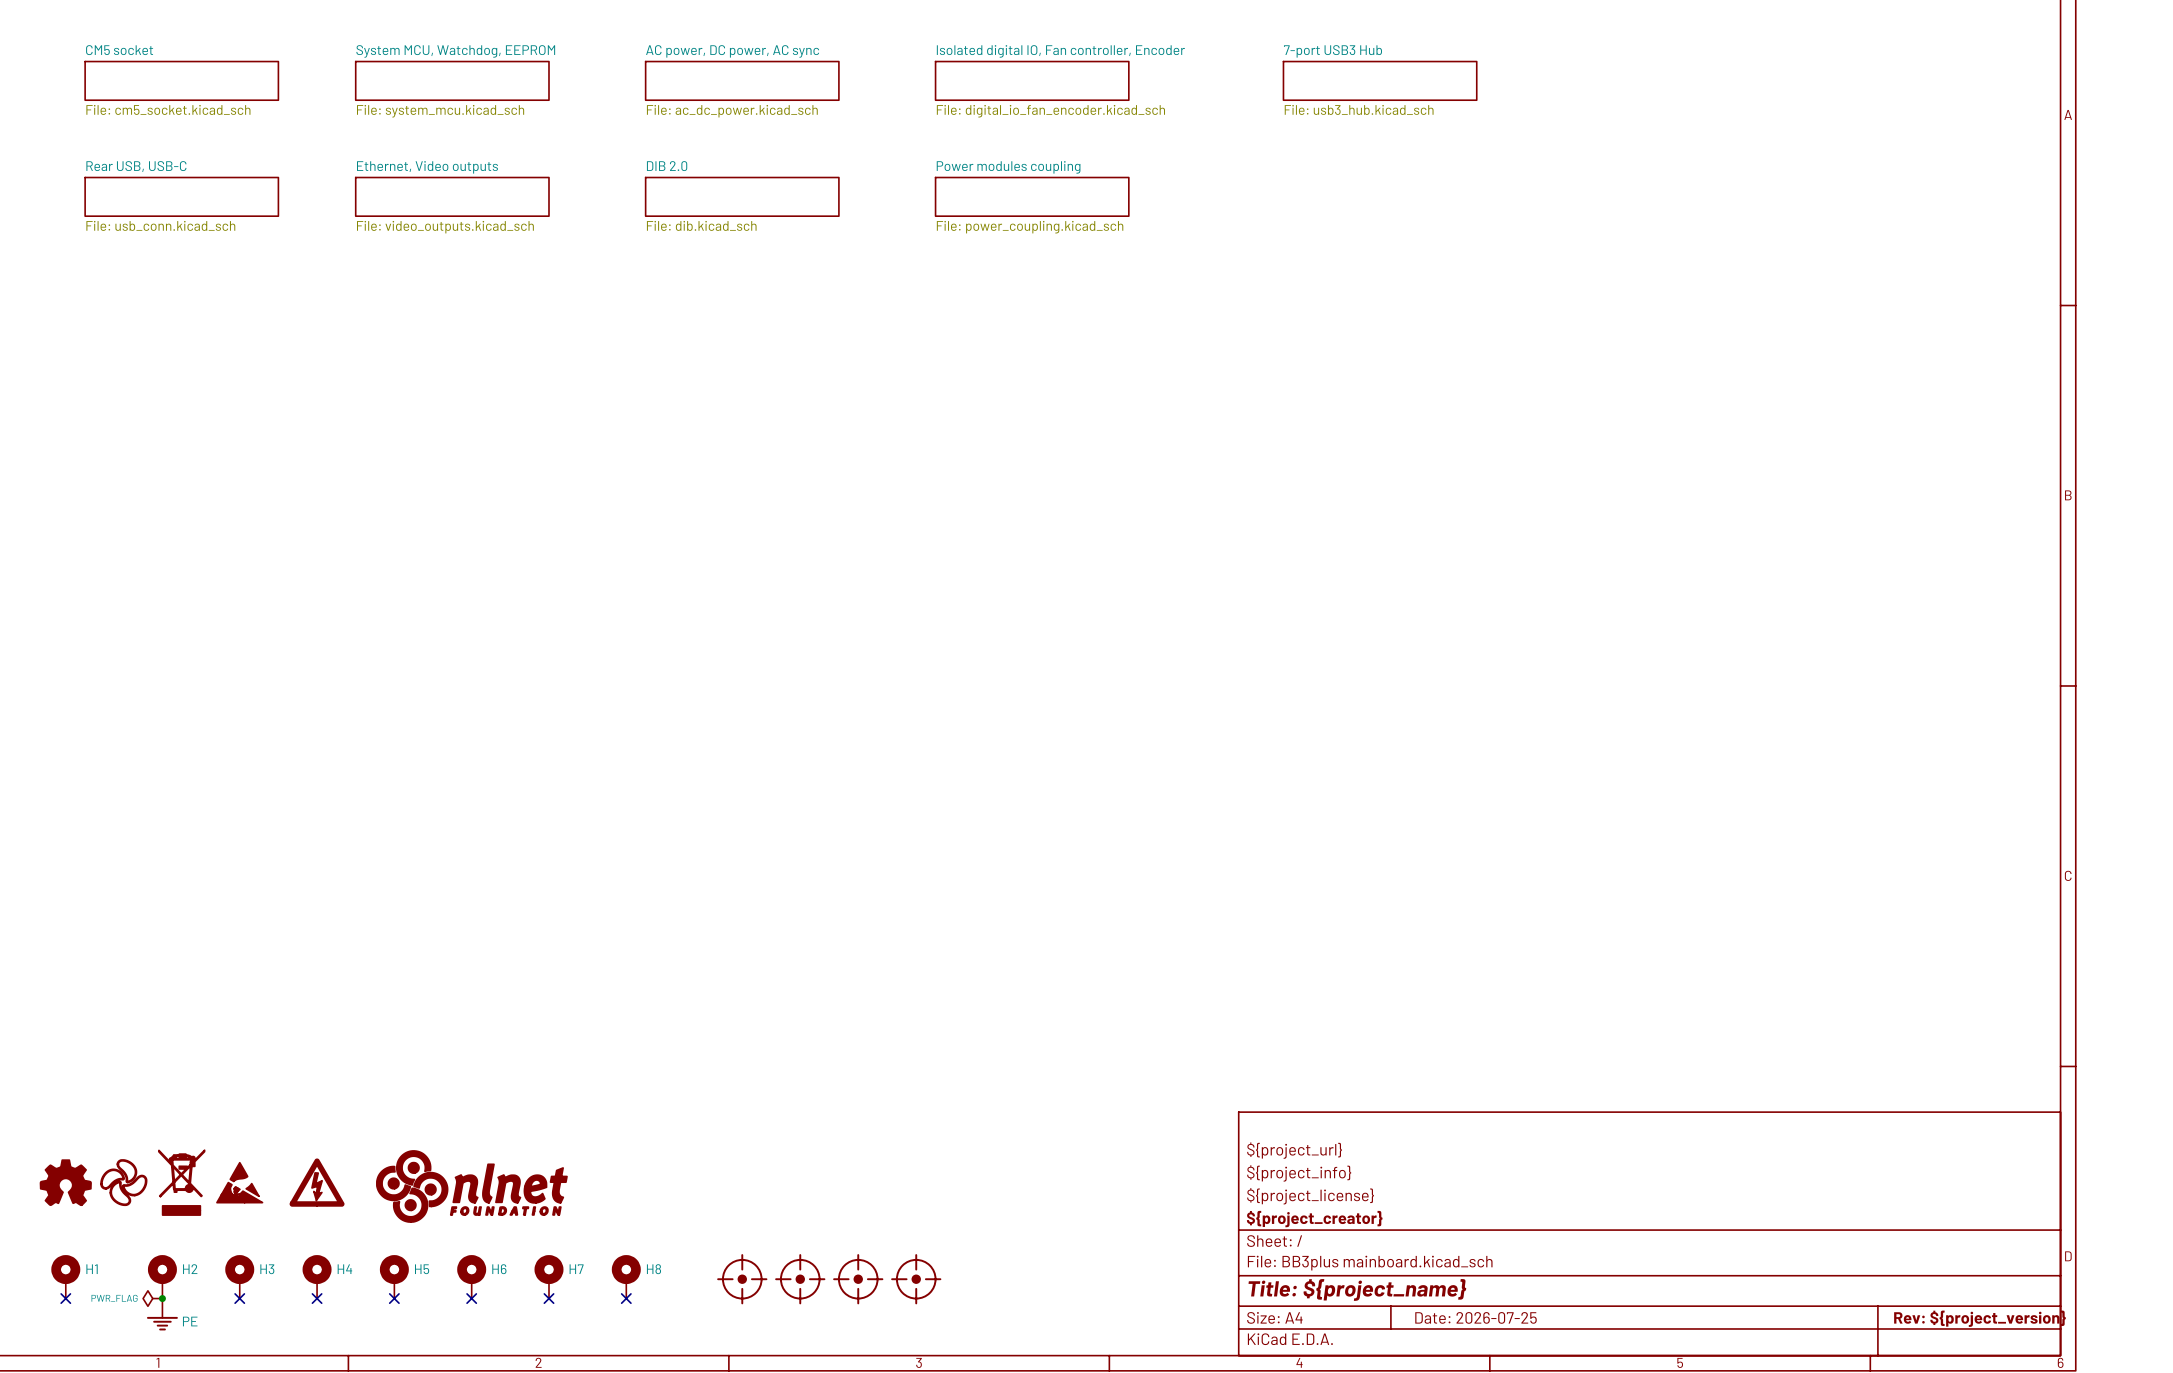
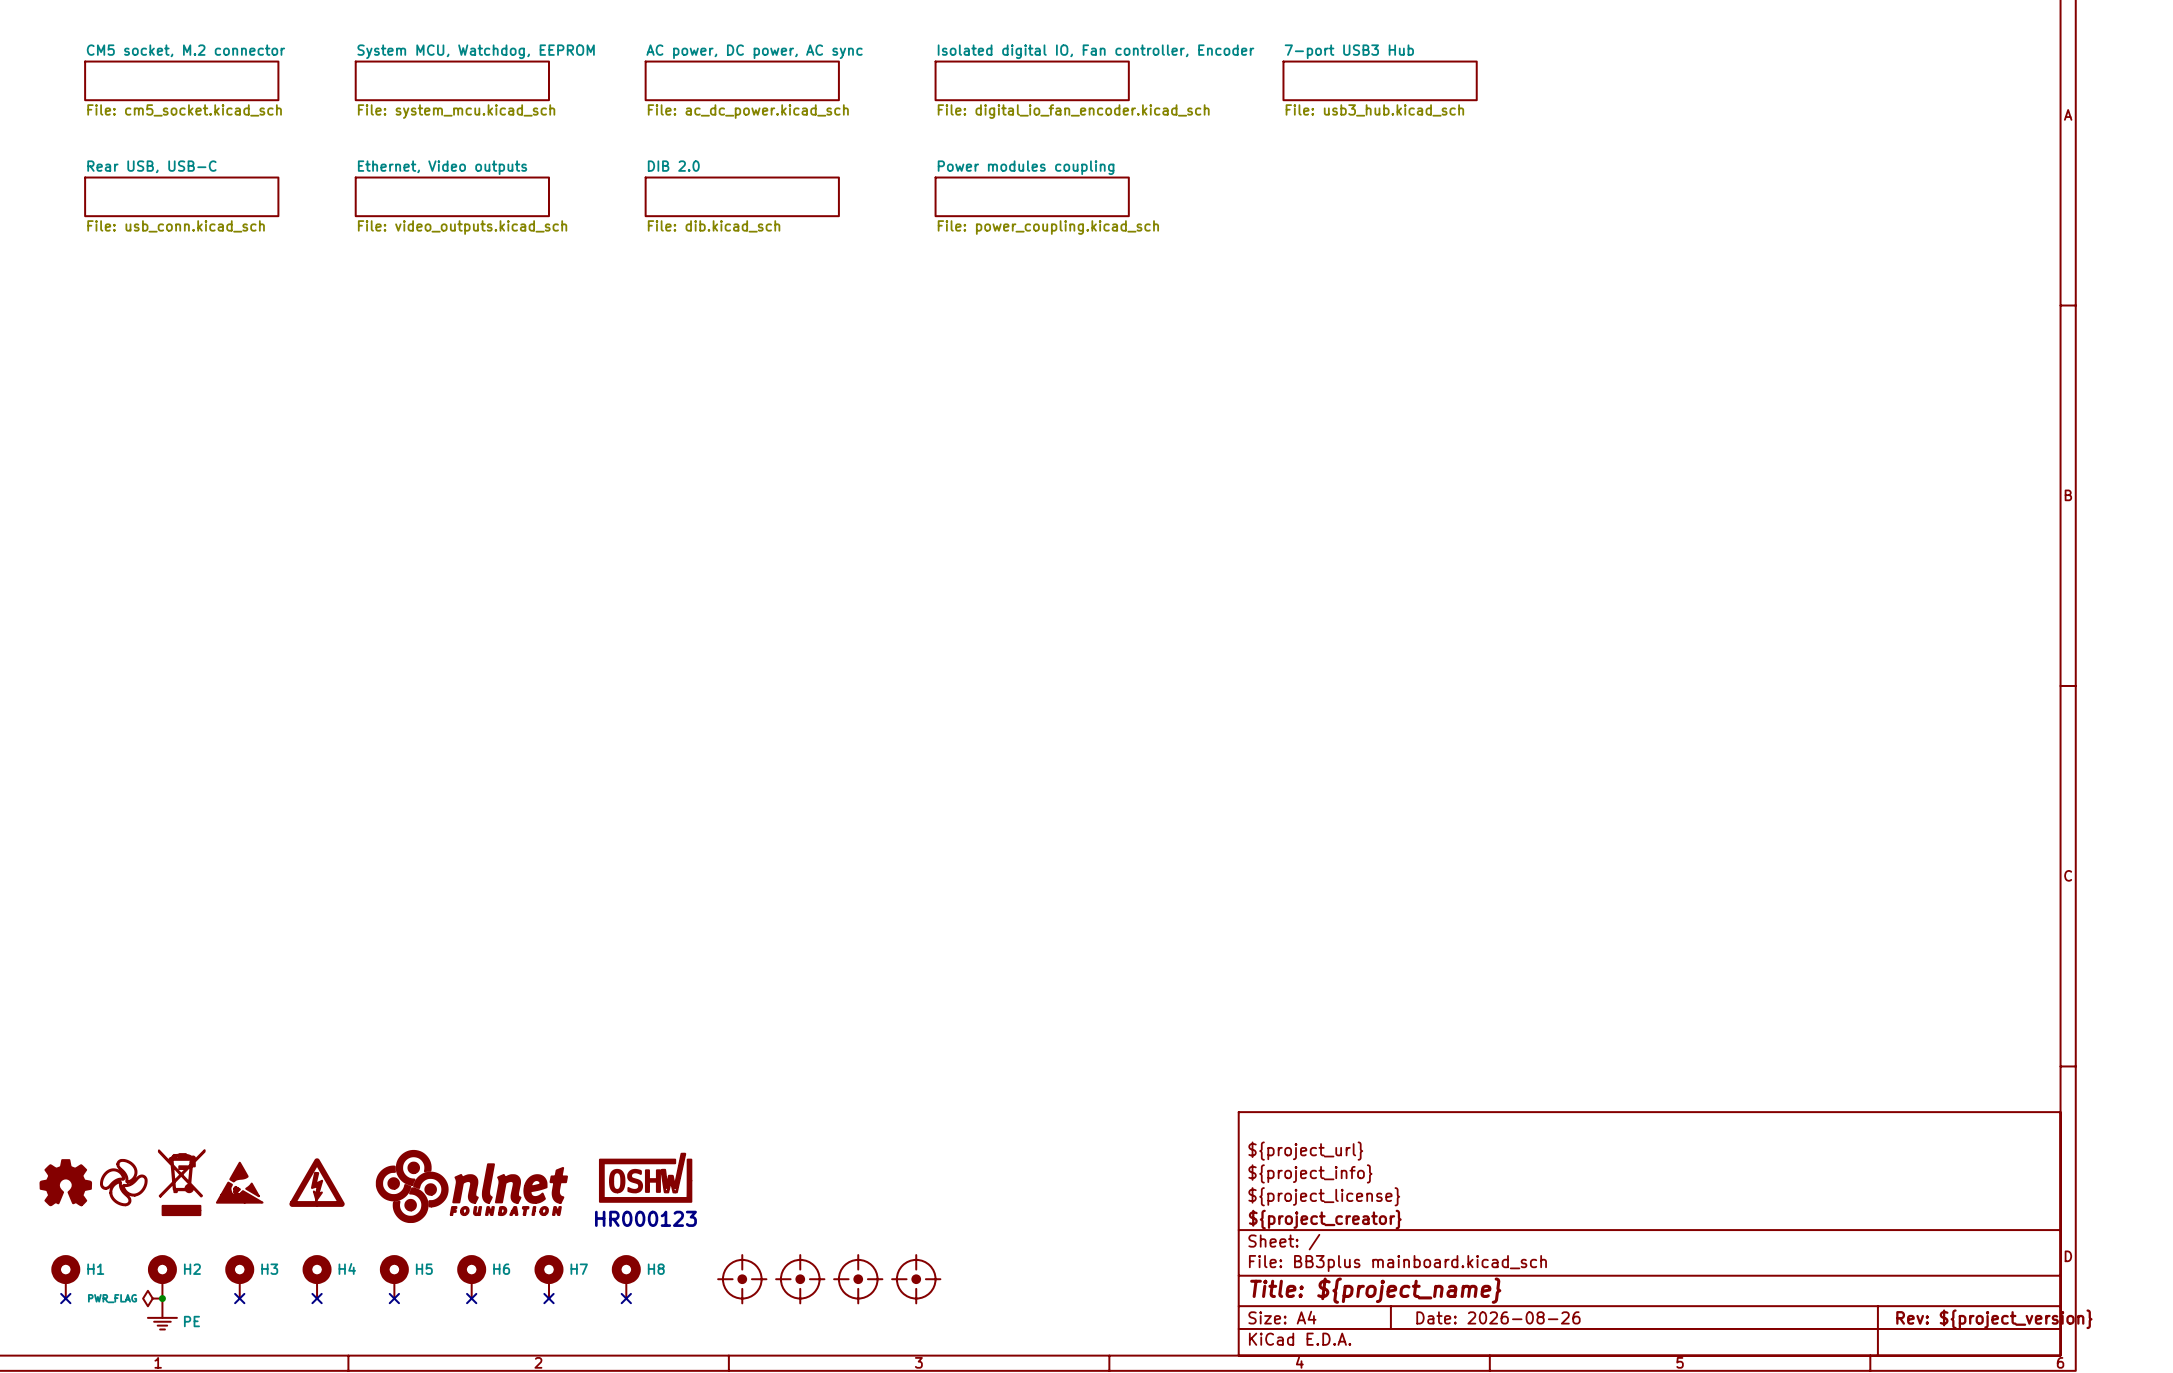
sheet CM5 socket name: CM5 socket (119, 50) -> CM5 socket, M.2 connector (185, 50)
part: none -> (645, 1177)
text: none -> HR000123 (645, 1218)
title block: Date: 2026-07-25 (1476, 1317) -> Date: 2026-08-26 (1498, 1317)

